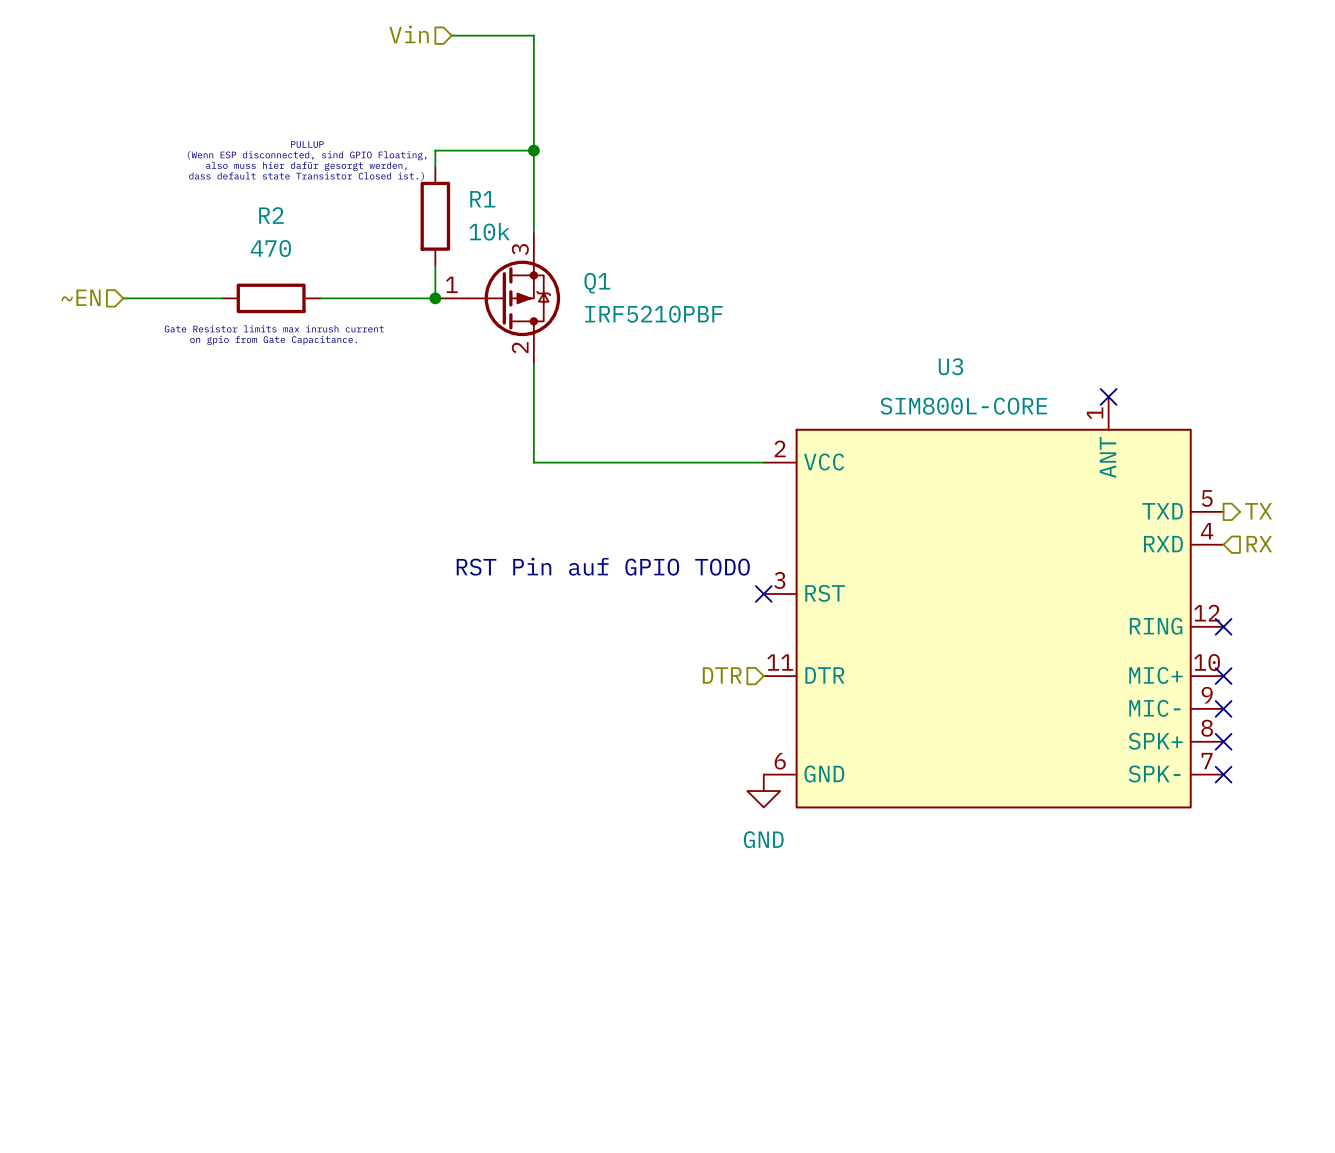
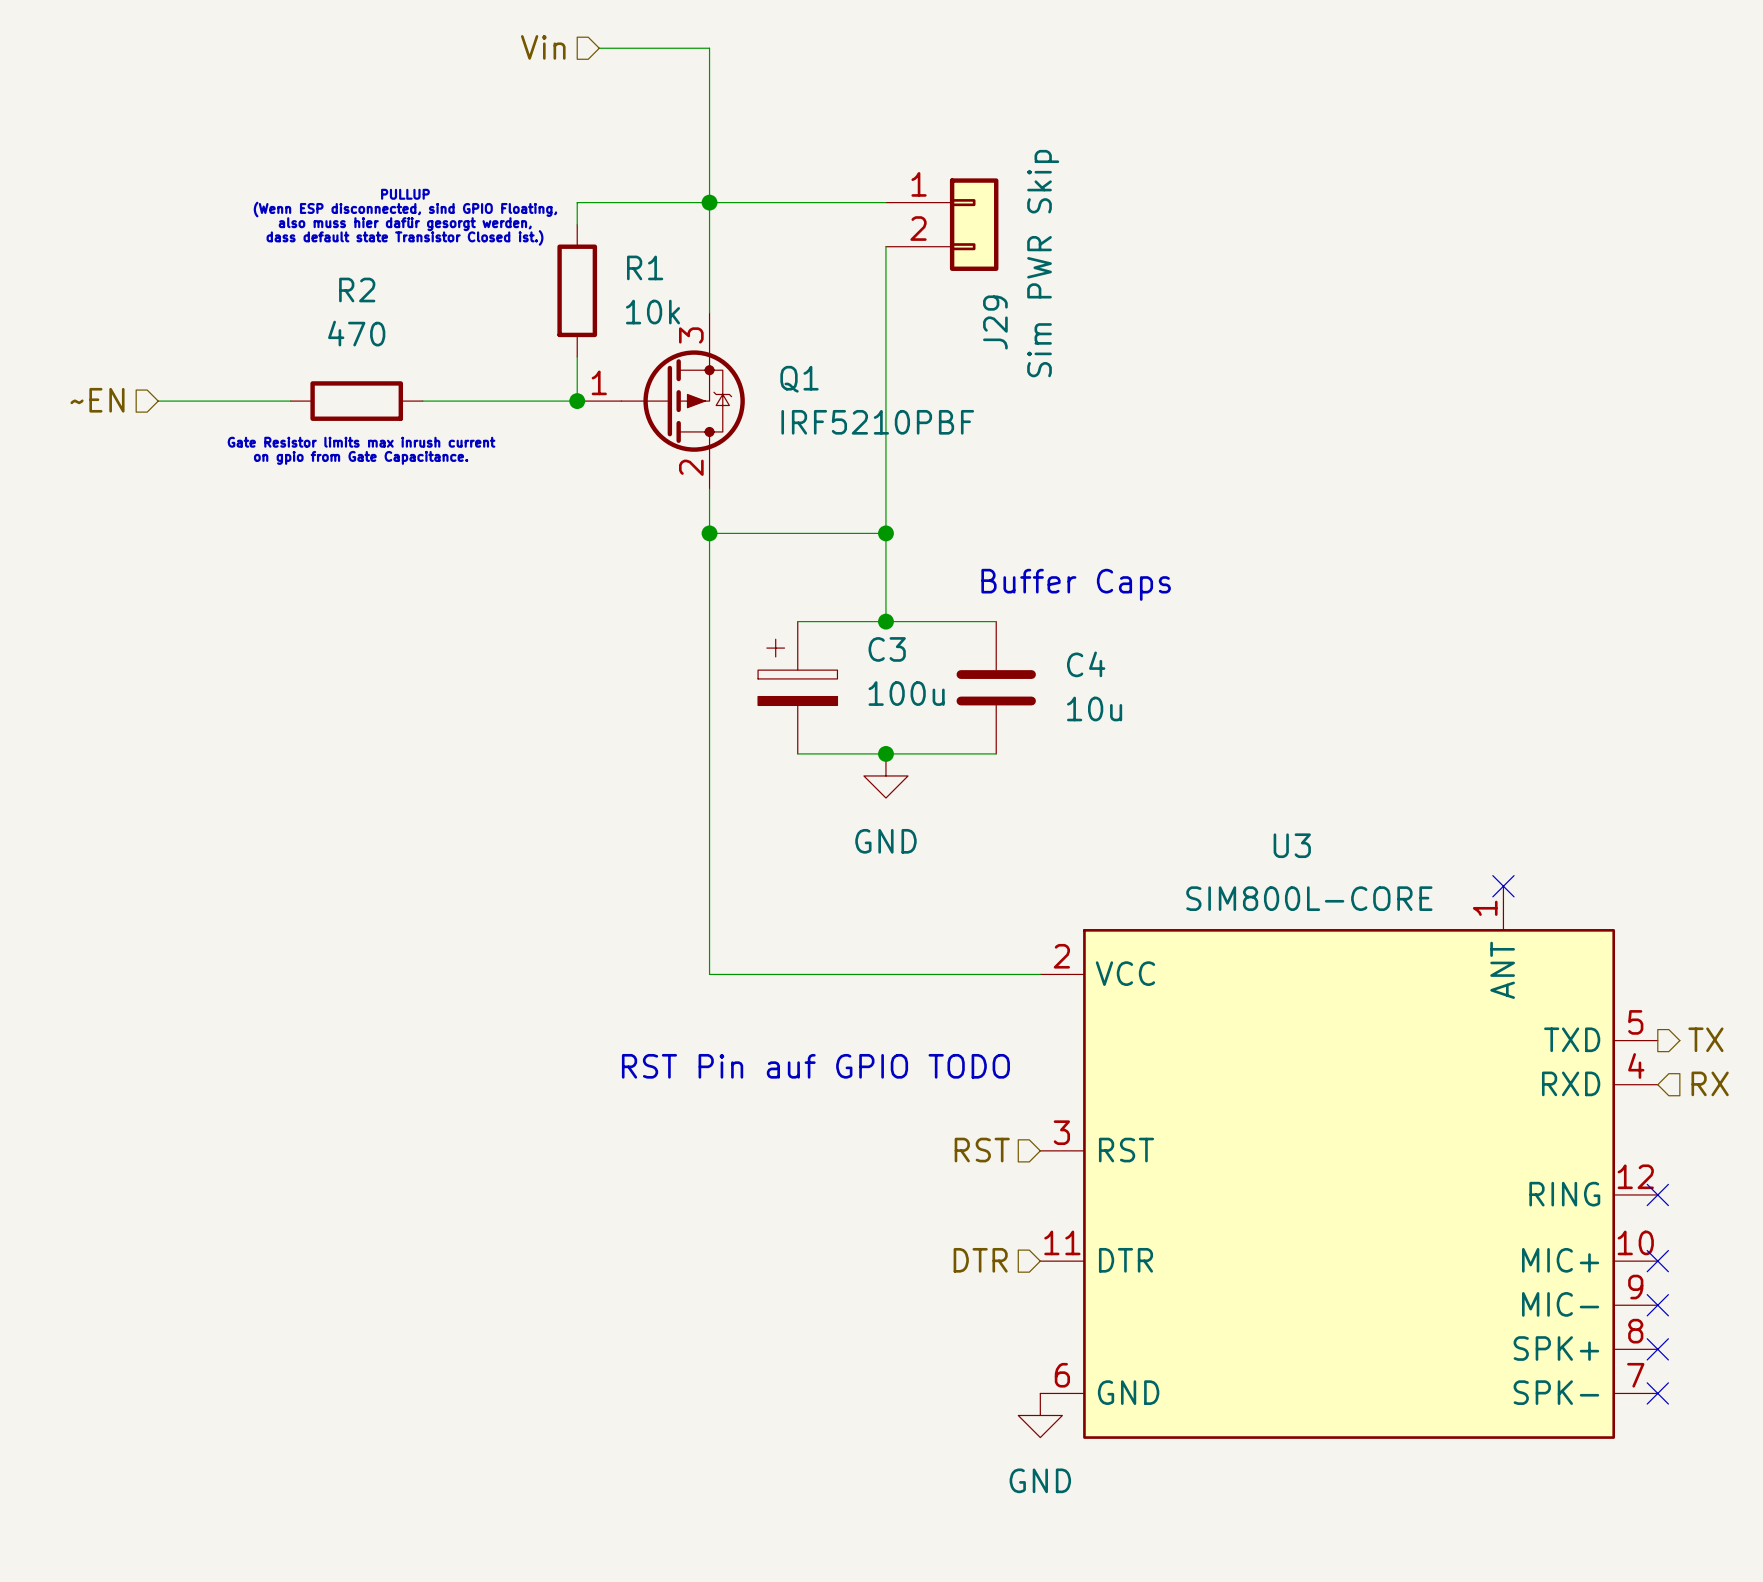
wire: none -> (709, 202) (885, 202)
J29: none -> Sim PWR Skip (942, 224)
wire: none -> (885, 246) (885, 621)
wire: none -> (709, 533) (885, 533)
junction: none -> (709, 533)
junction: none -> (885, 533)
no-connect mark: (1108, 396) -> none
text: none -> Buffer Caps (1076, 584)
wire: (533, 462) (599, 462) -> (709, 621) (709, 974) (1040, 974)
junction: none -> (885, 621)
wire: (747, 462) (763, 462) -> none
C3: none -> 100u (797, 687)
C4: none -> 10u (996, 687)
hierarchical label position: TX (1258, 511) -> TX (1705, 1039)
hierarchical label position: RX (1259, 544) -> RX (1710, 1083)
wire: none -> (797, 753) (996, 753)
junction: none -> (885, 753)
text position: RST Pin auf GPIO TODO (603, 566) -> RST Pin auf GPIO TODO (815, 1066)
power symbol: none -> GND (885, 775)
no-connect mark: (763, 593) -> none
U3 position: (993, 602) -> (1349, 1162)
no-connect mark: (1223, 626) -> none
no-connect mark: none -> (1503, 886)
hierarchical label position: DTR (722, 675) -> DTR (980, 1260)
no-connect mark: (1223, 676) -> none
no-connect mark: (1223, 708) -> none
no-connect mark: (1223, 741) -> none
no-connect mark: (1223, 774) -> none
power symbol: GND (763, 791) -> none
hierarchical label: none -> RST (982, 1150)
no-connect mark: none -> (1657, 1194)
no-connect mark: none -> (1657, 1261)
no-connect mark: none -> (1657, 1305)
no-connect mark: none -> (1657, 1349)
no-connect mark: none -> (1657, 1393)
power symbol: none -> GND (1040, 1415)

